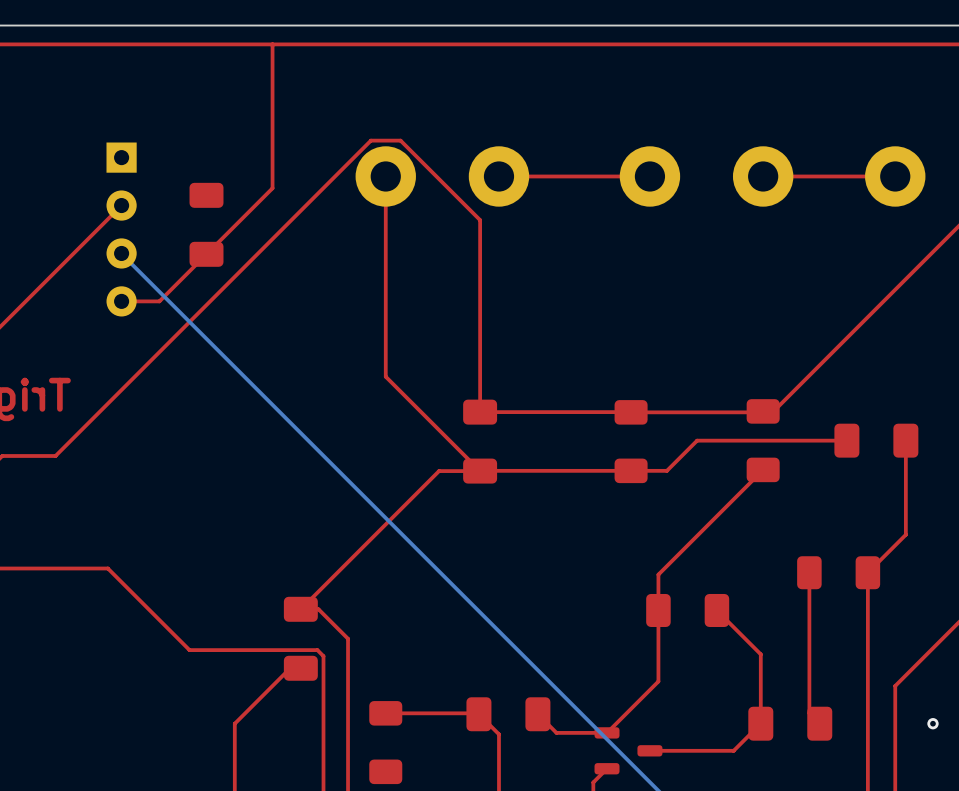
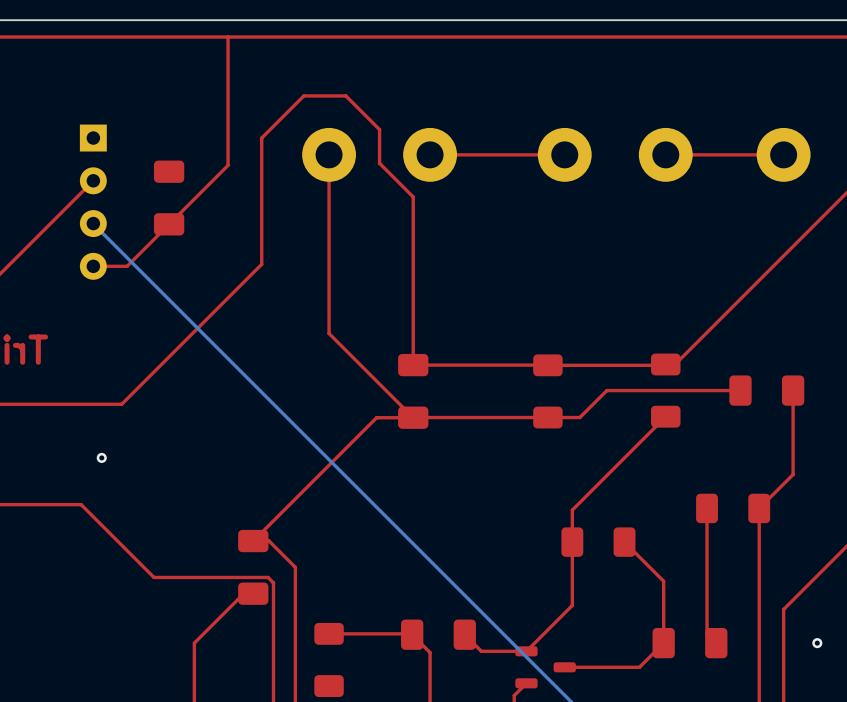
top track: (480, 223) (480, 220) (400, 140) (370, 140) (55, 455) -> (413, 196) (379, 163) (379, 129) (345, 95) (303, 95) (261, 138) (261, 264) (121, 404) (34, 404)
via: none -> (101, 457)

